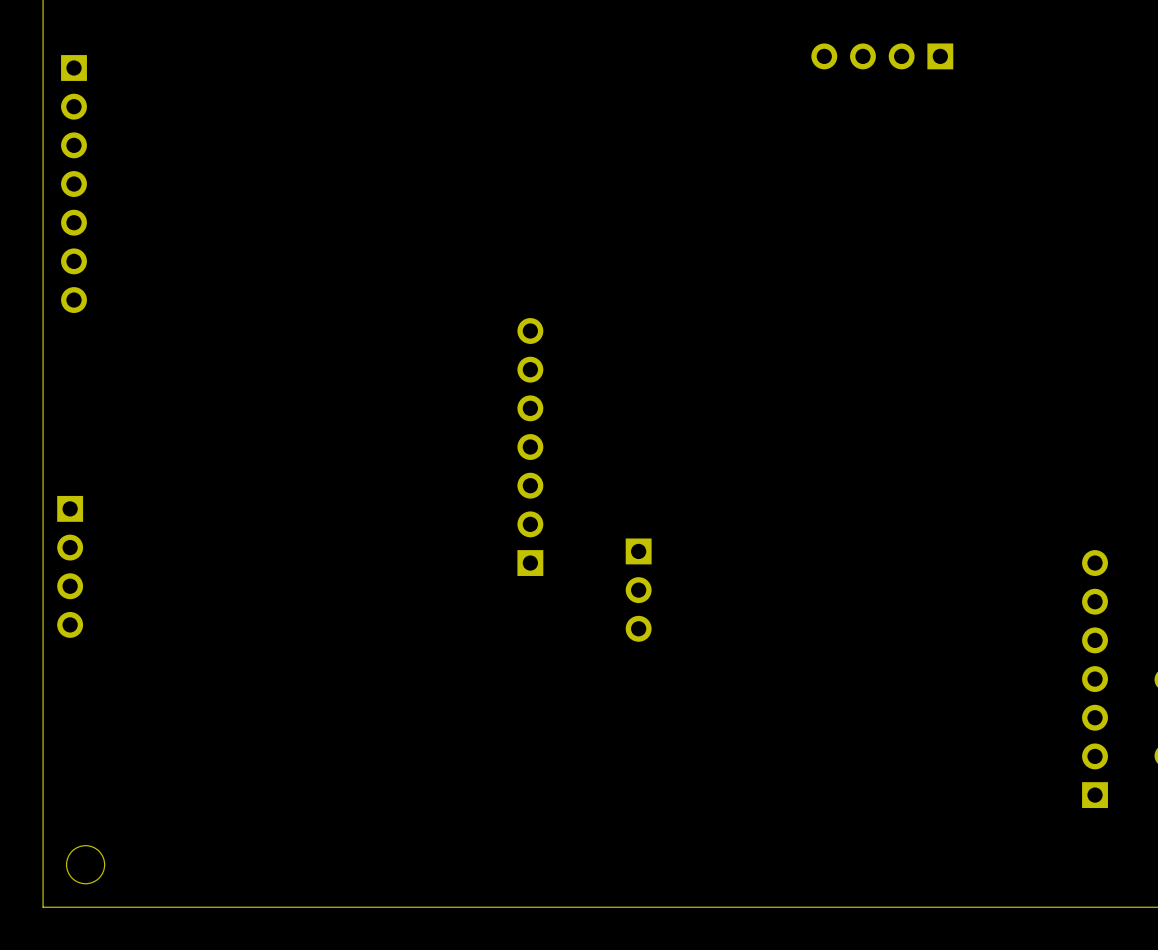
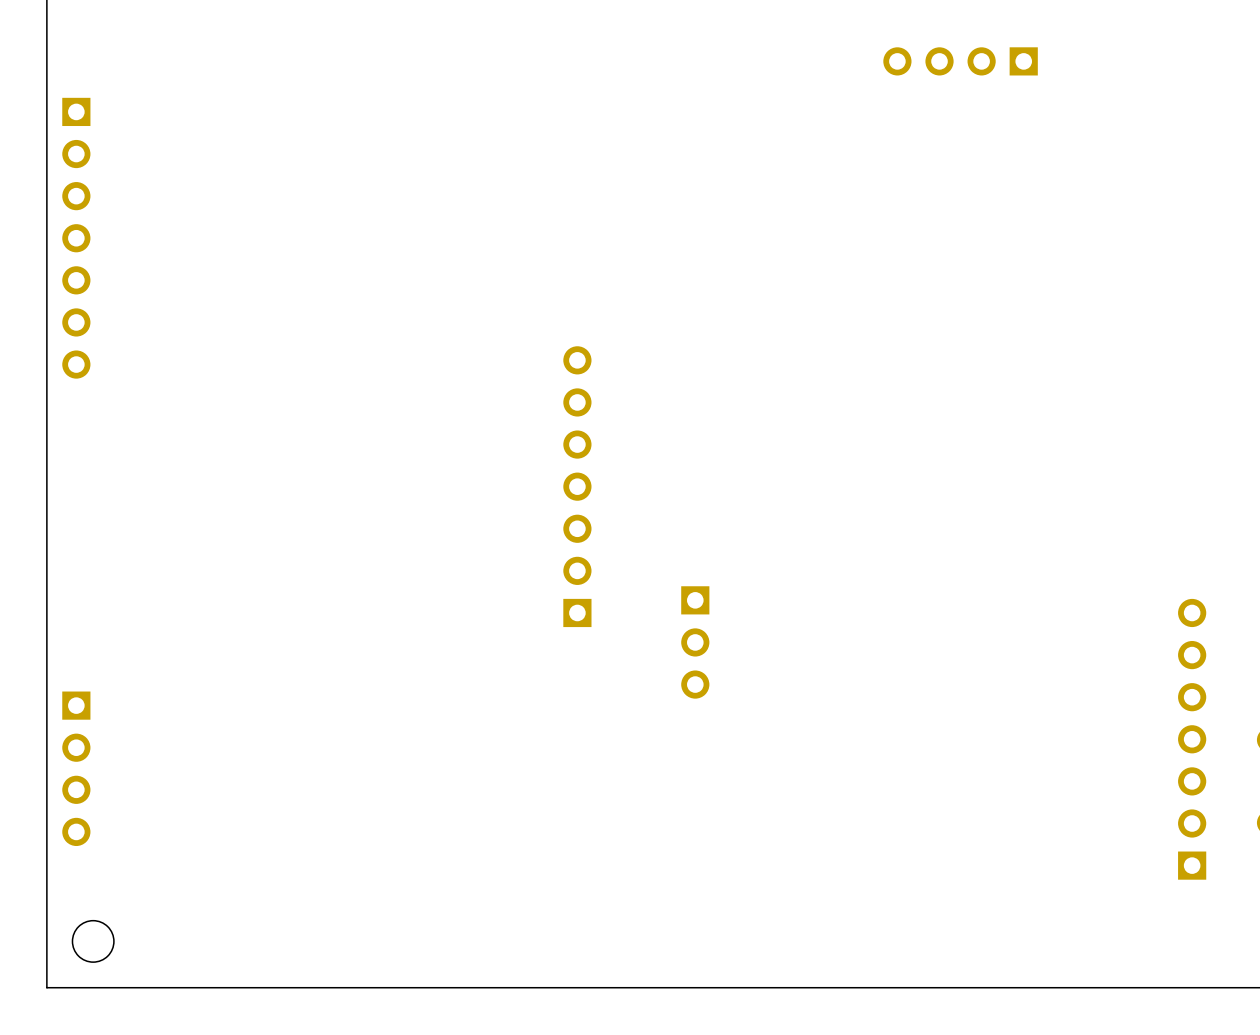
part position: (74, 184) -> (76, 238)
part position: (70, 566) -> (76, 768)

